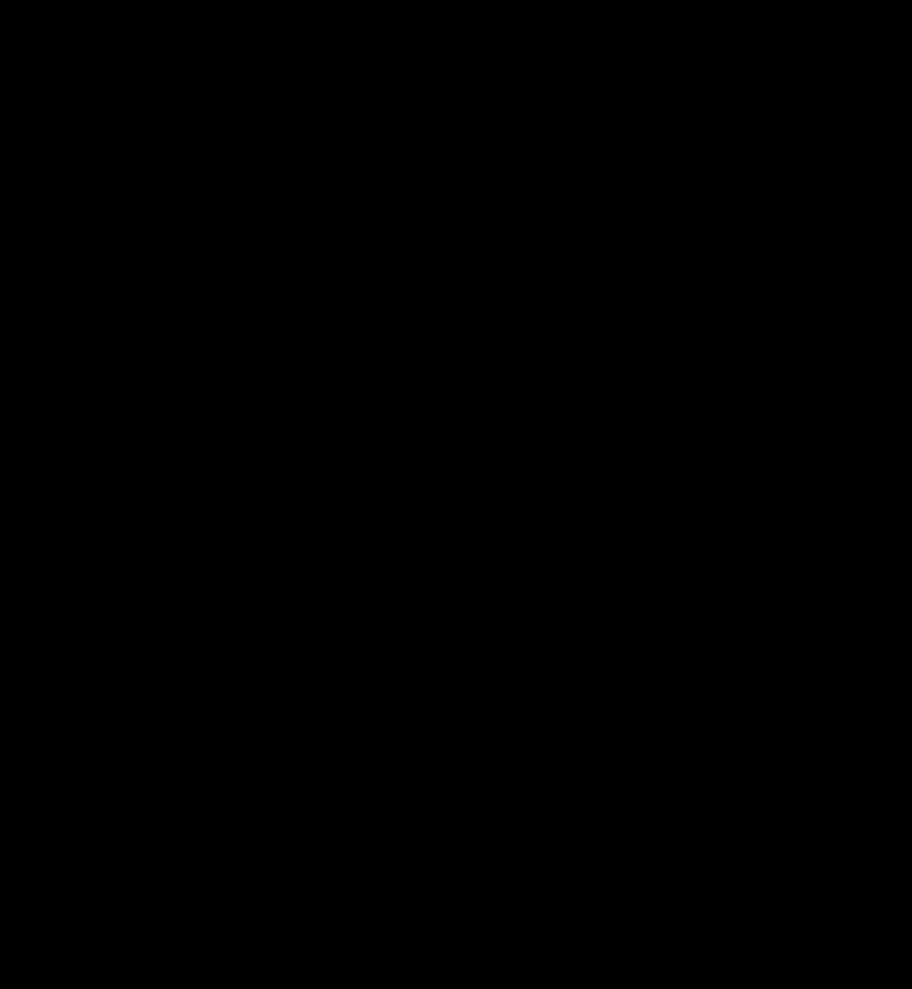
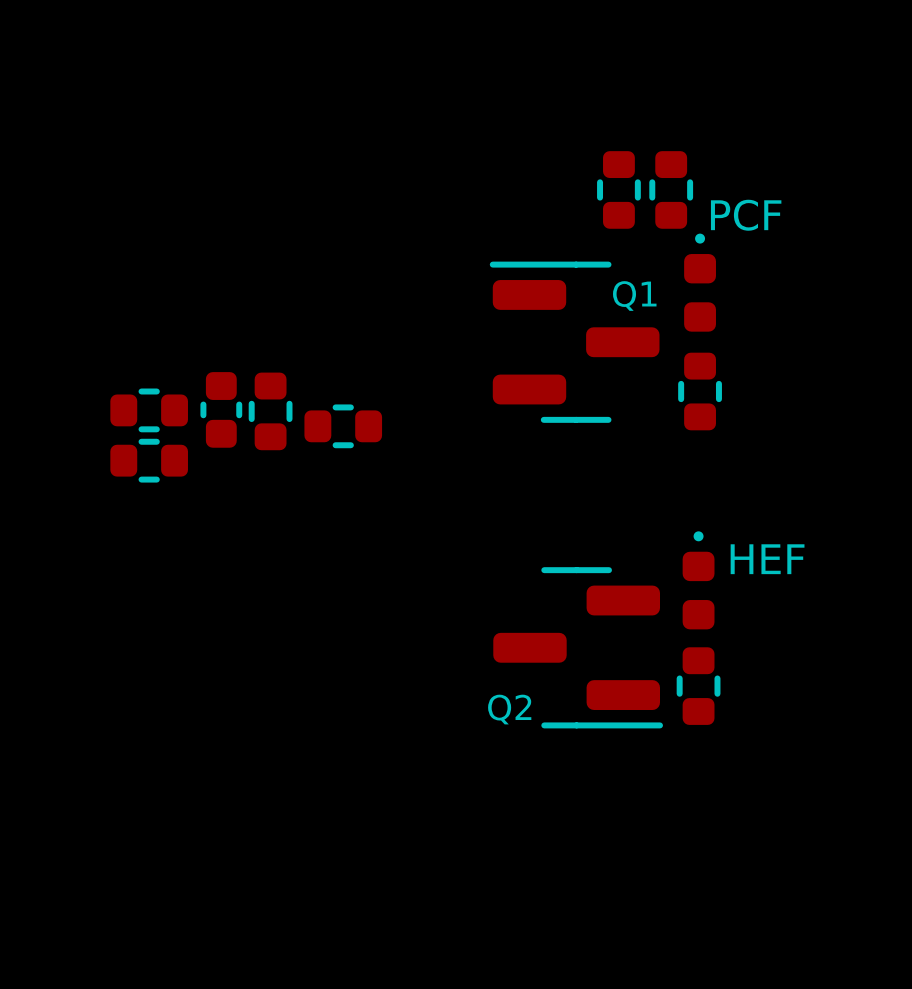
part: none -> (618, 189)
part: none -> (671, 189)
part: none -> PCF (700, 282)
Q1: none -> (574, 342)
part: none -> (700, 391)
part: none -> (221, 409)
part: none -> (149, 410)
part: none -> (270, 411)
part: none -> (343, 426)
part: none -> (149, 460)
part: none -> HEF (698, 580)
Q2: none -> (578, 647)
part: none -> (698, 686)

